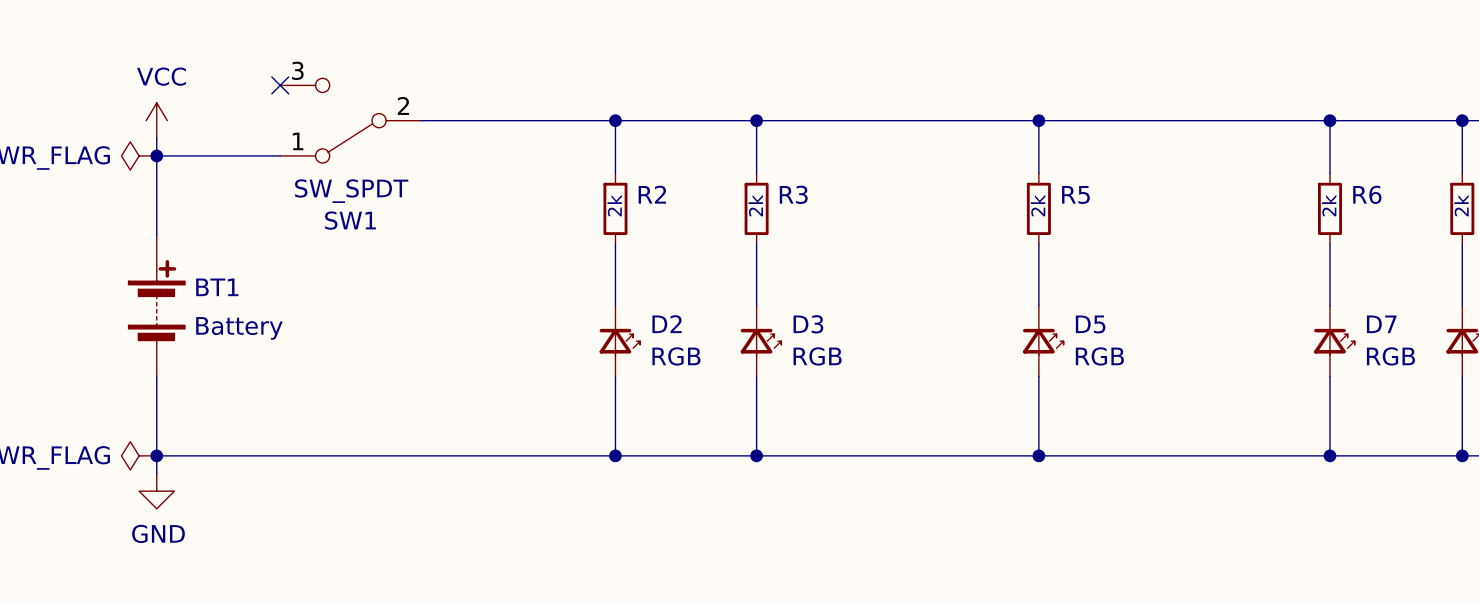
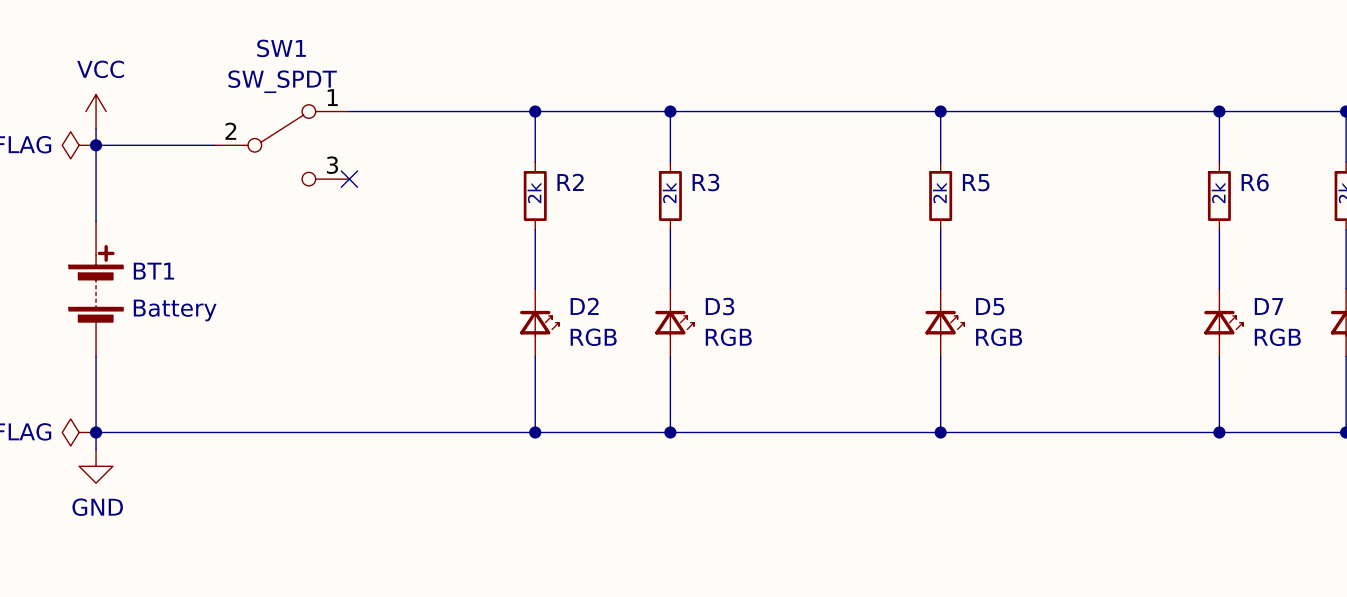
no-connect mark: (280, 85) -> none
SW1 rotation: 0° (350, 120) -> 180° (281, 145)
no-connect mark: none -> (349, 179)

